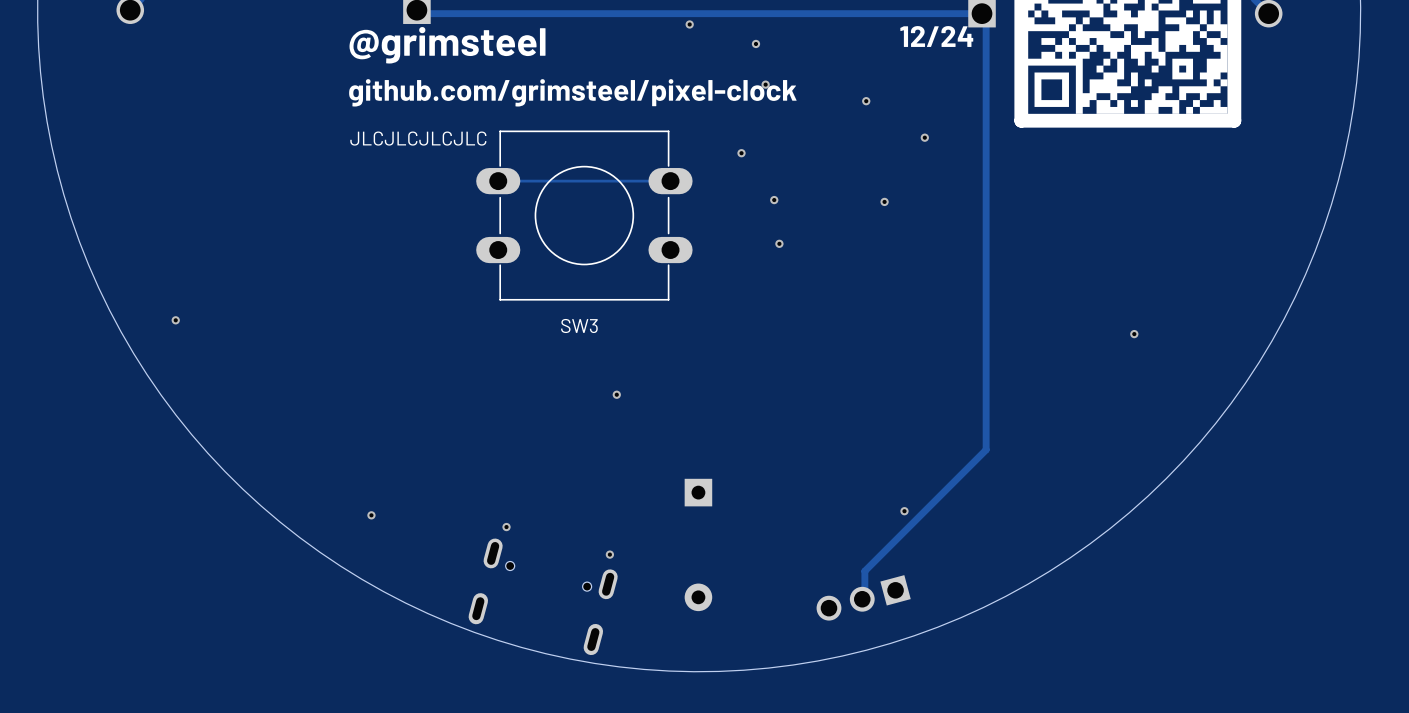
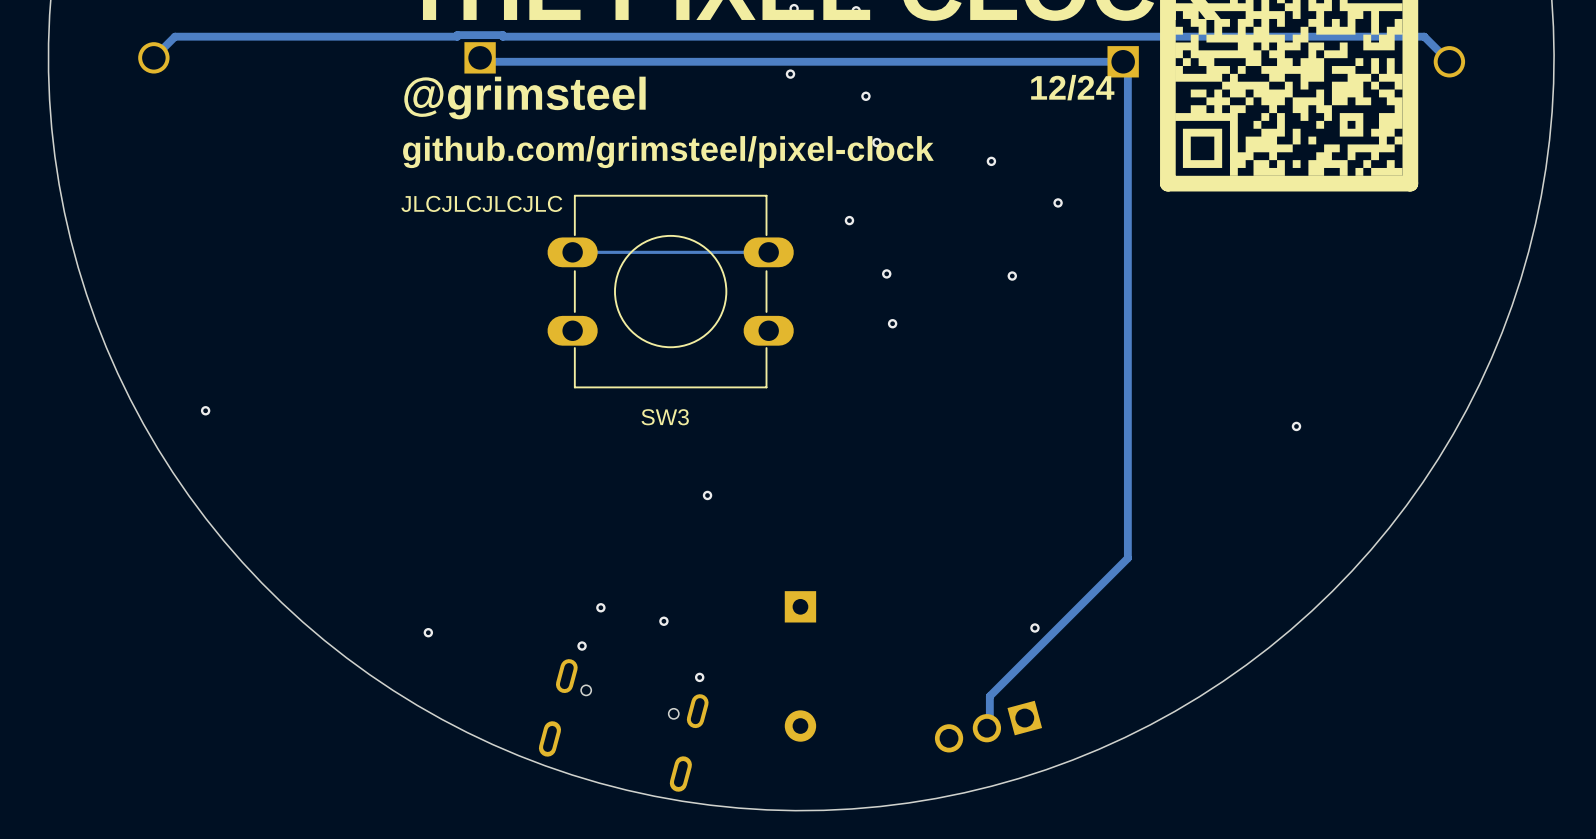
via: none -> (600, 607)
via: none -> (663, 621)

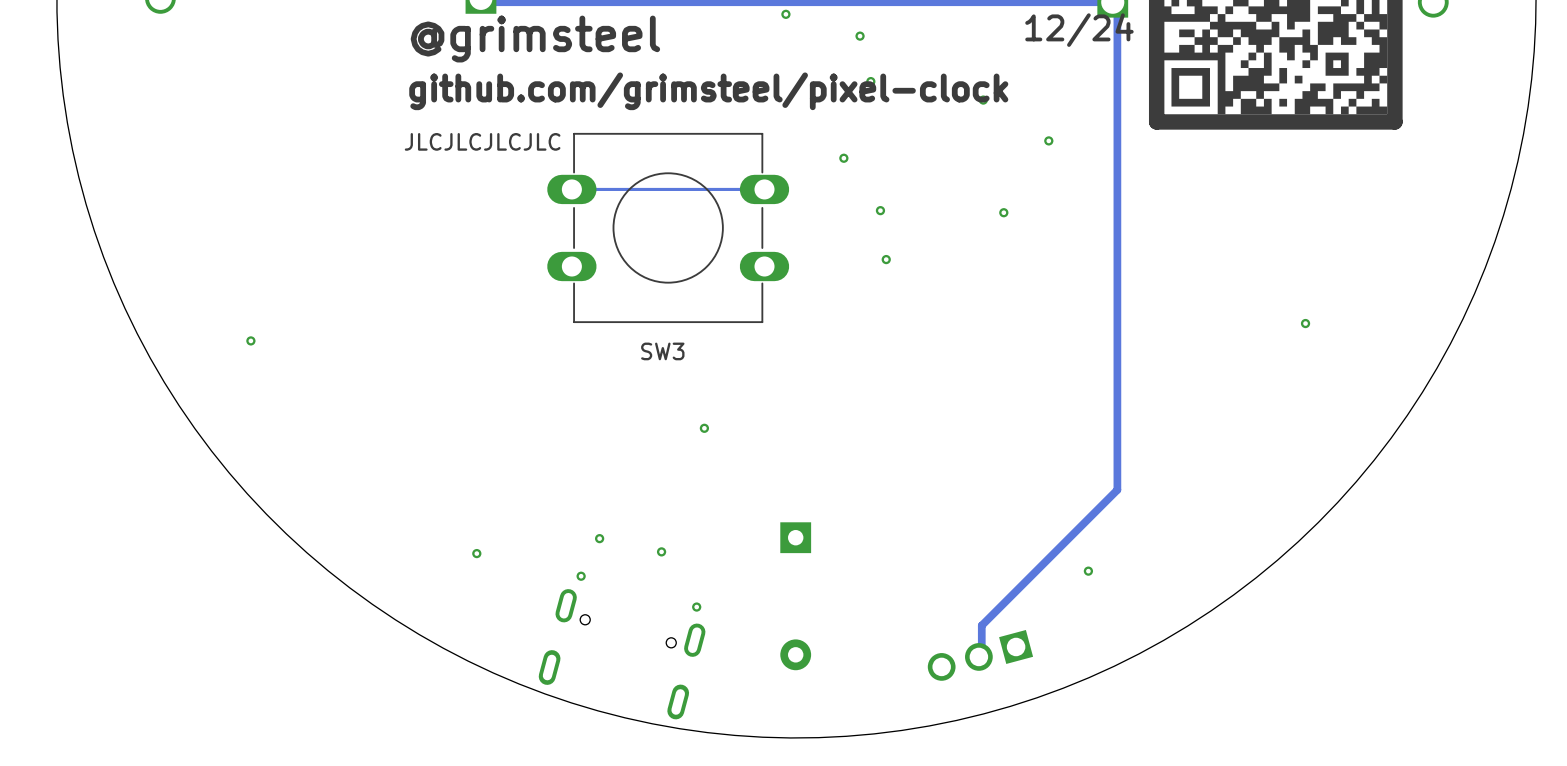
via position: (205, 410) -> (250, 340)
via position: (1296, 426) -> (1305, 323)
via position: (1034, 627) -> (1088, 571)
via position: (428, 632) -> (476, 553)

